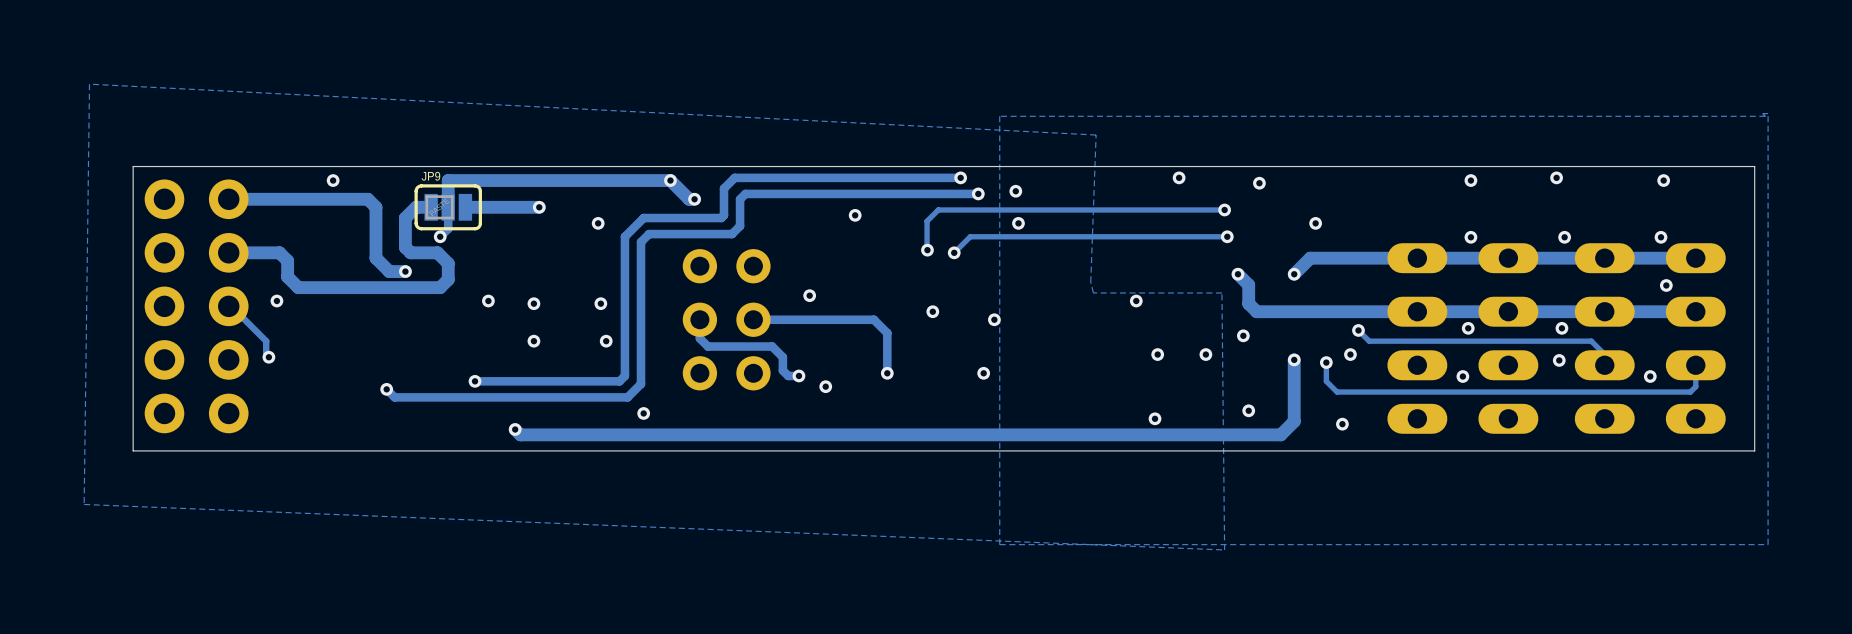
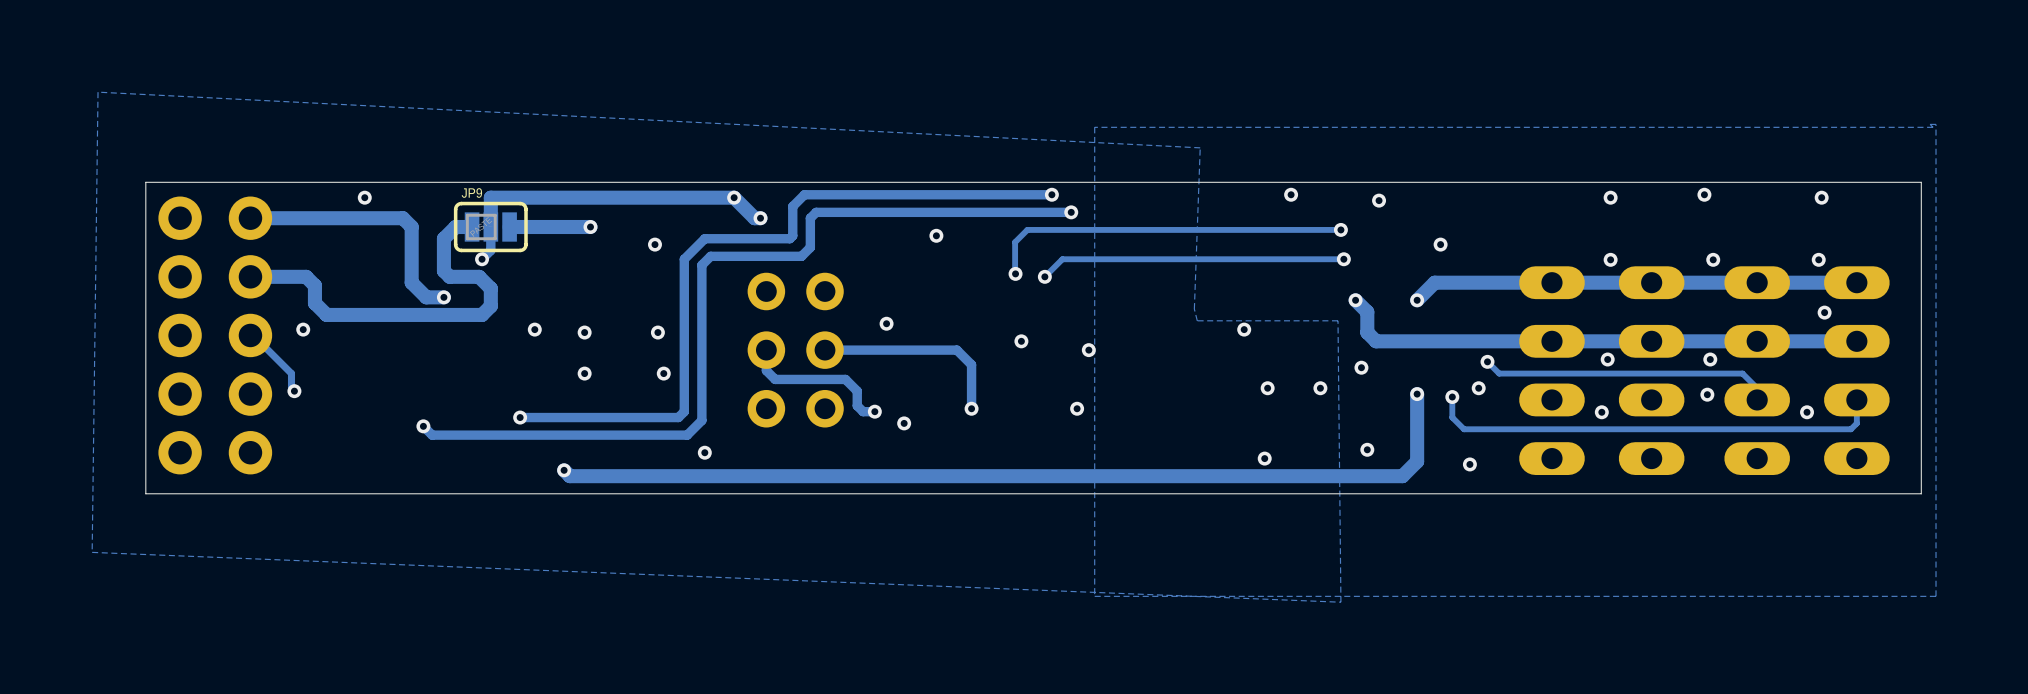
via: (1015, 191) -> none
via: (1018, 223) -> none

